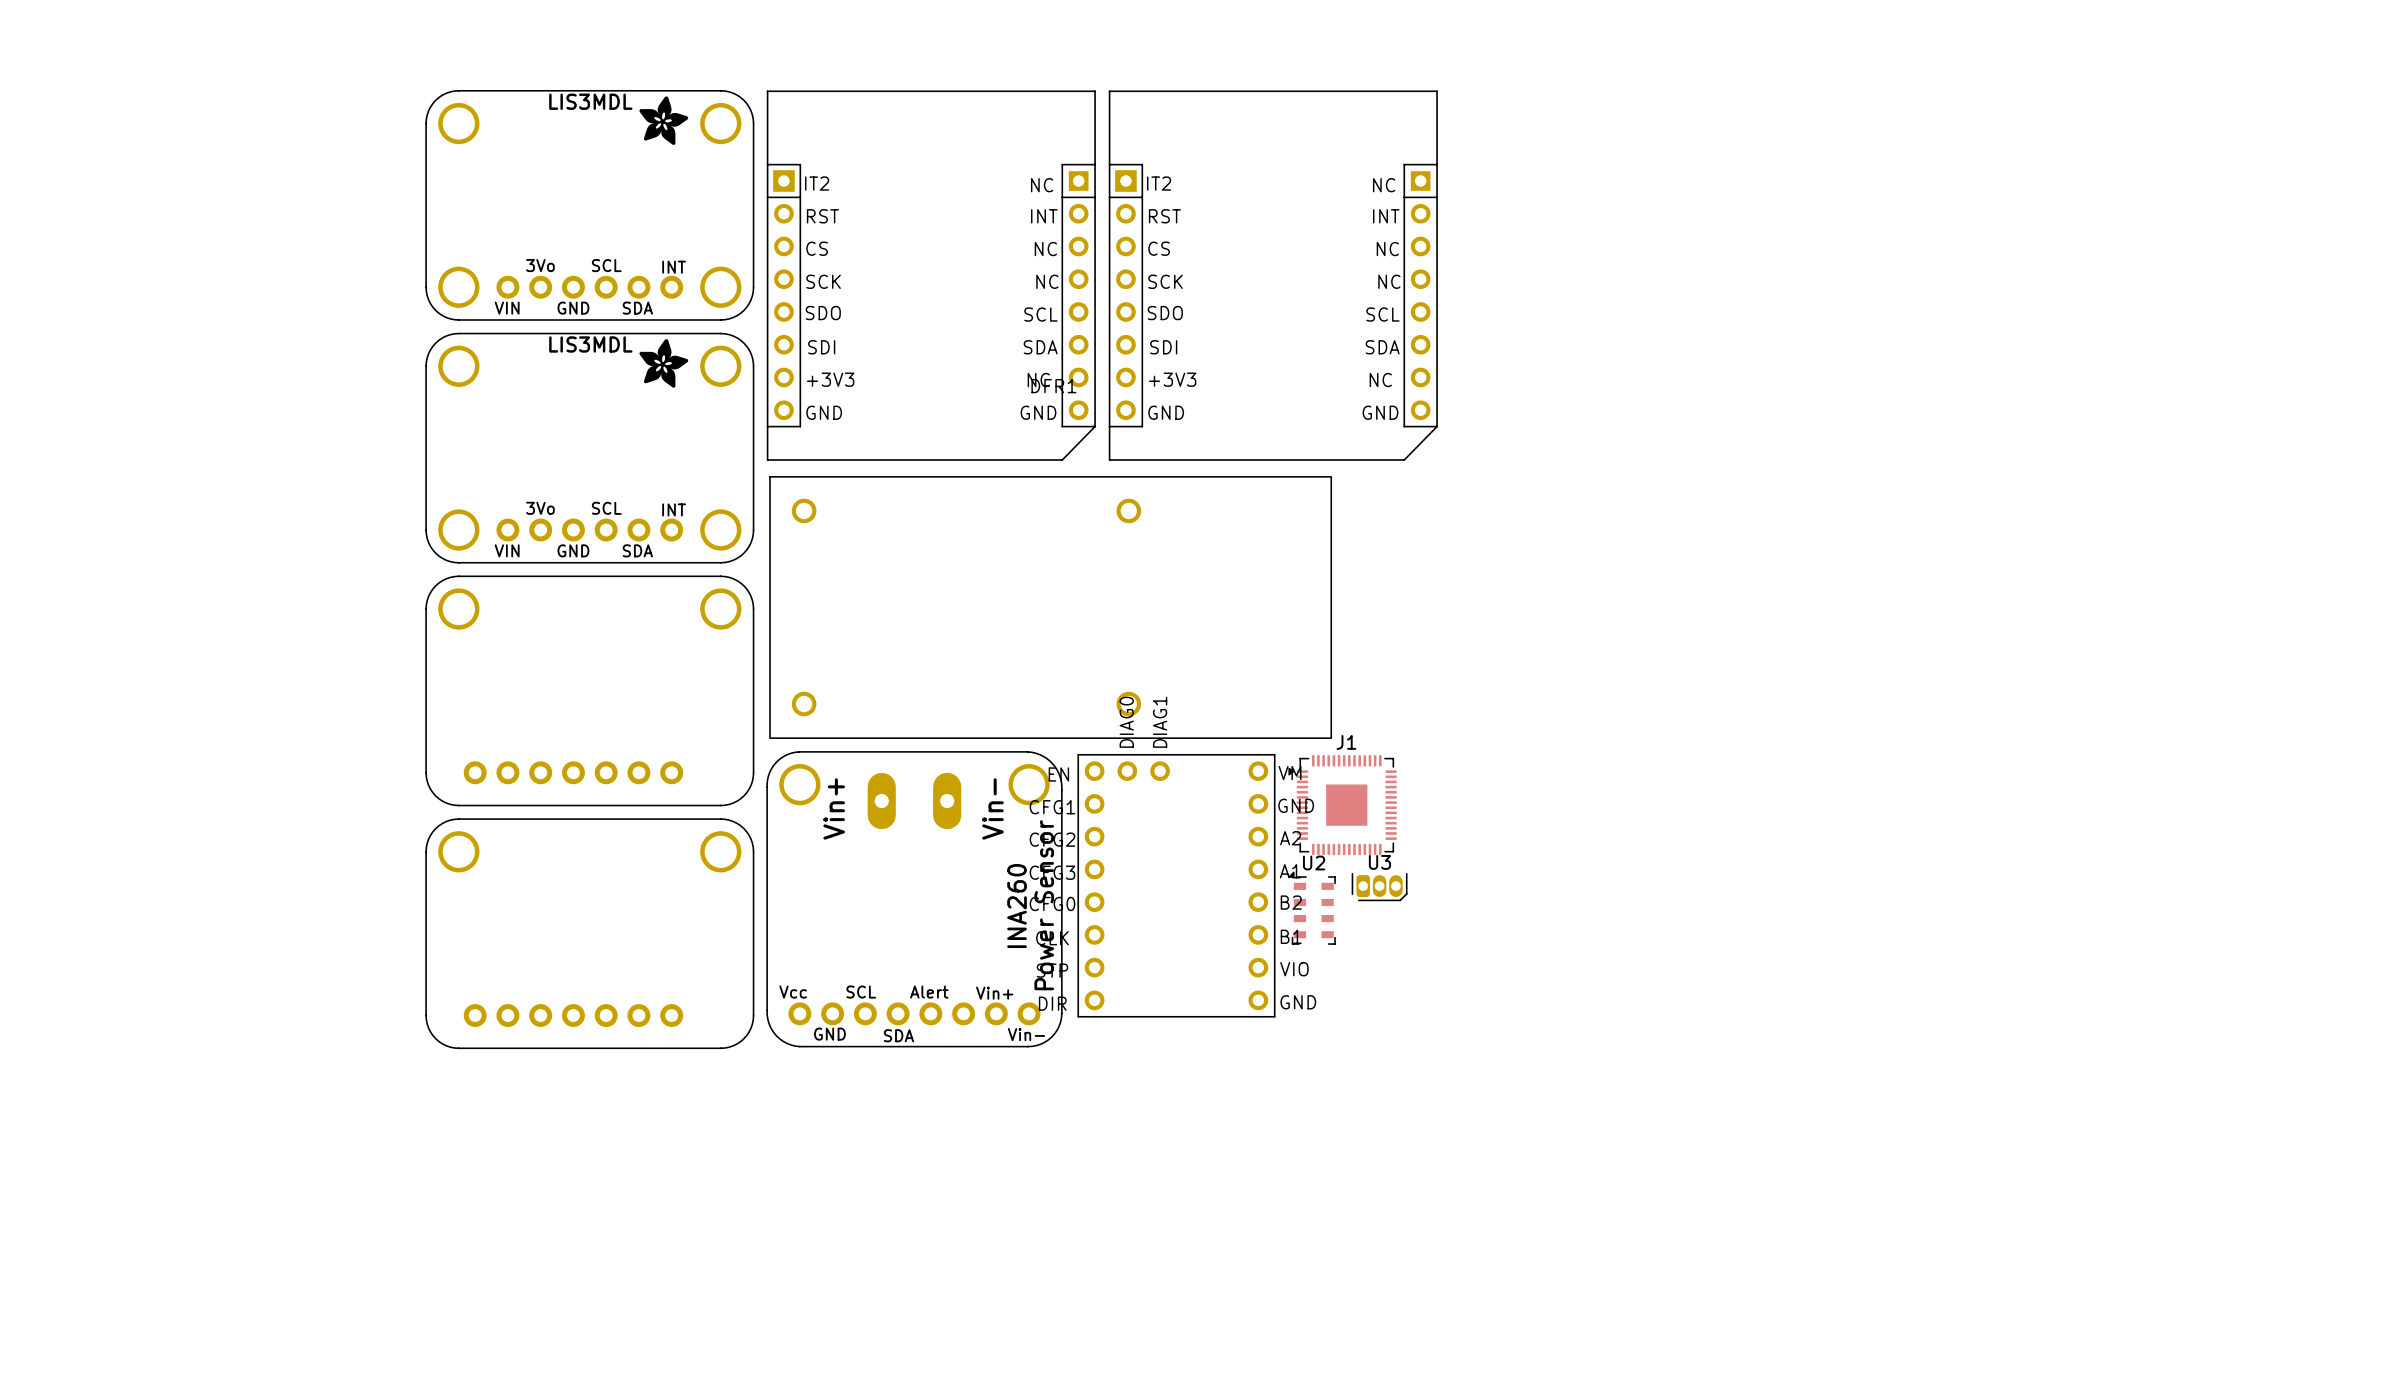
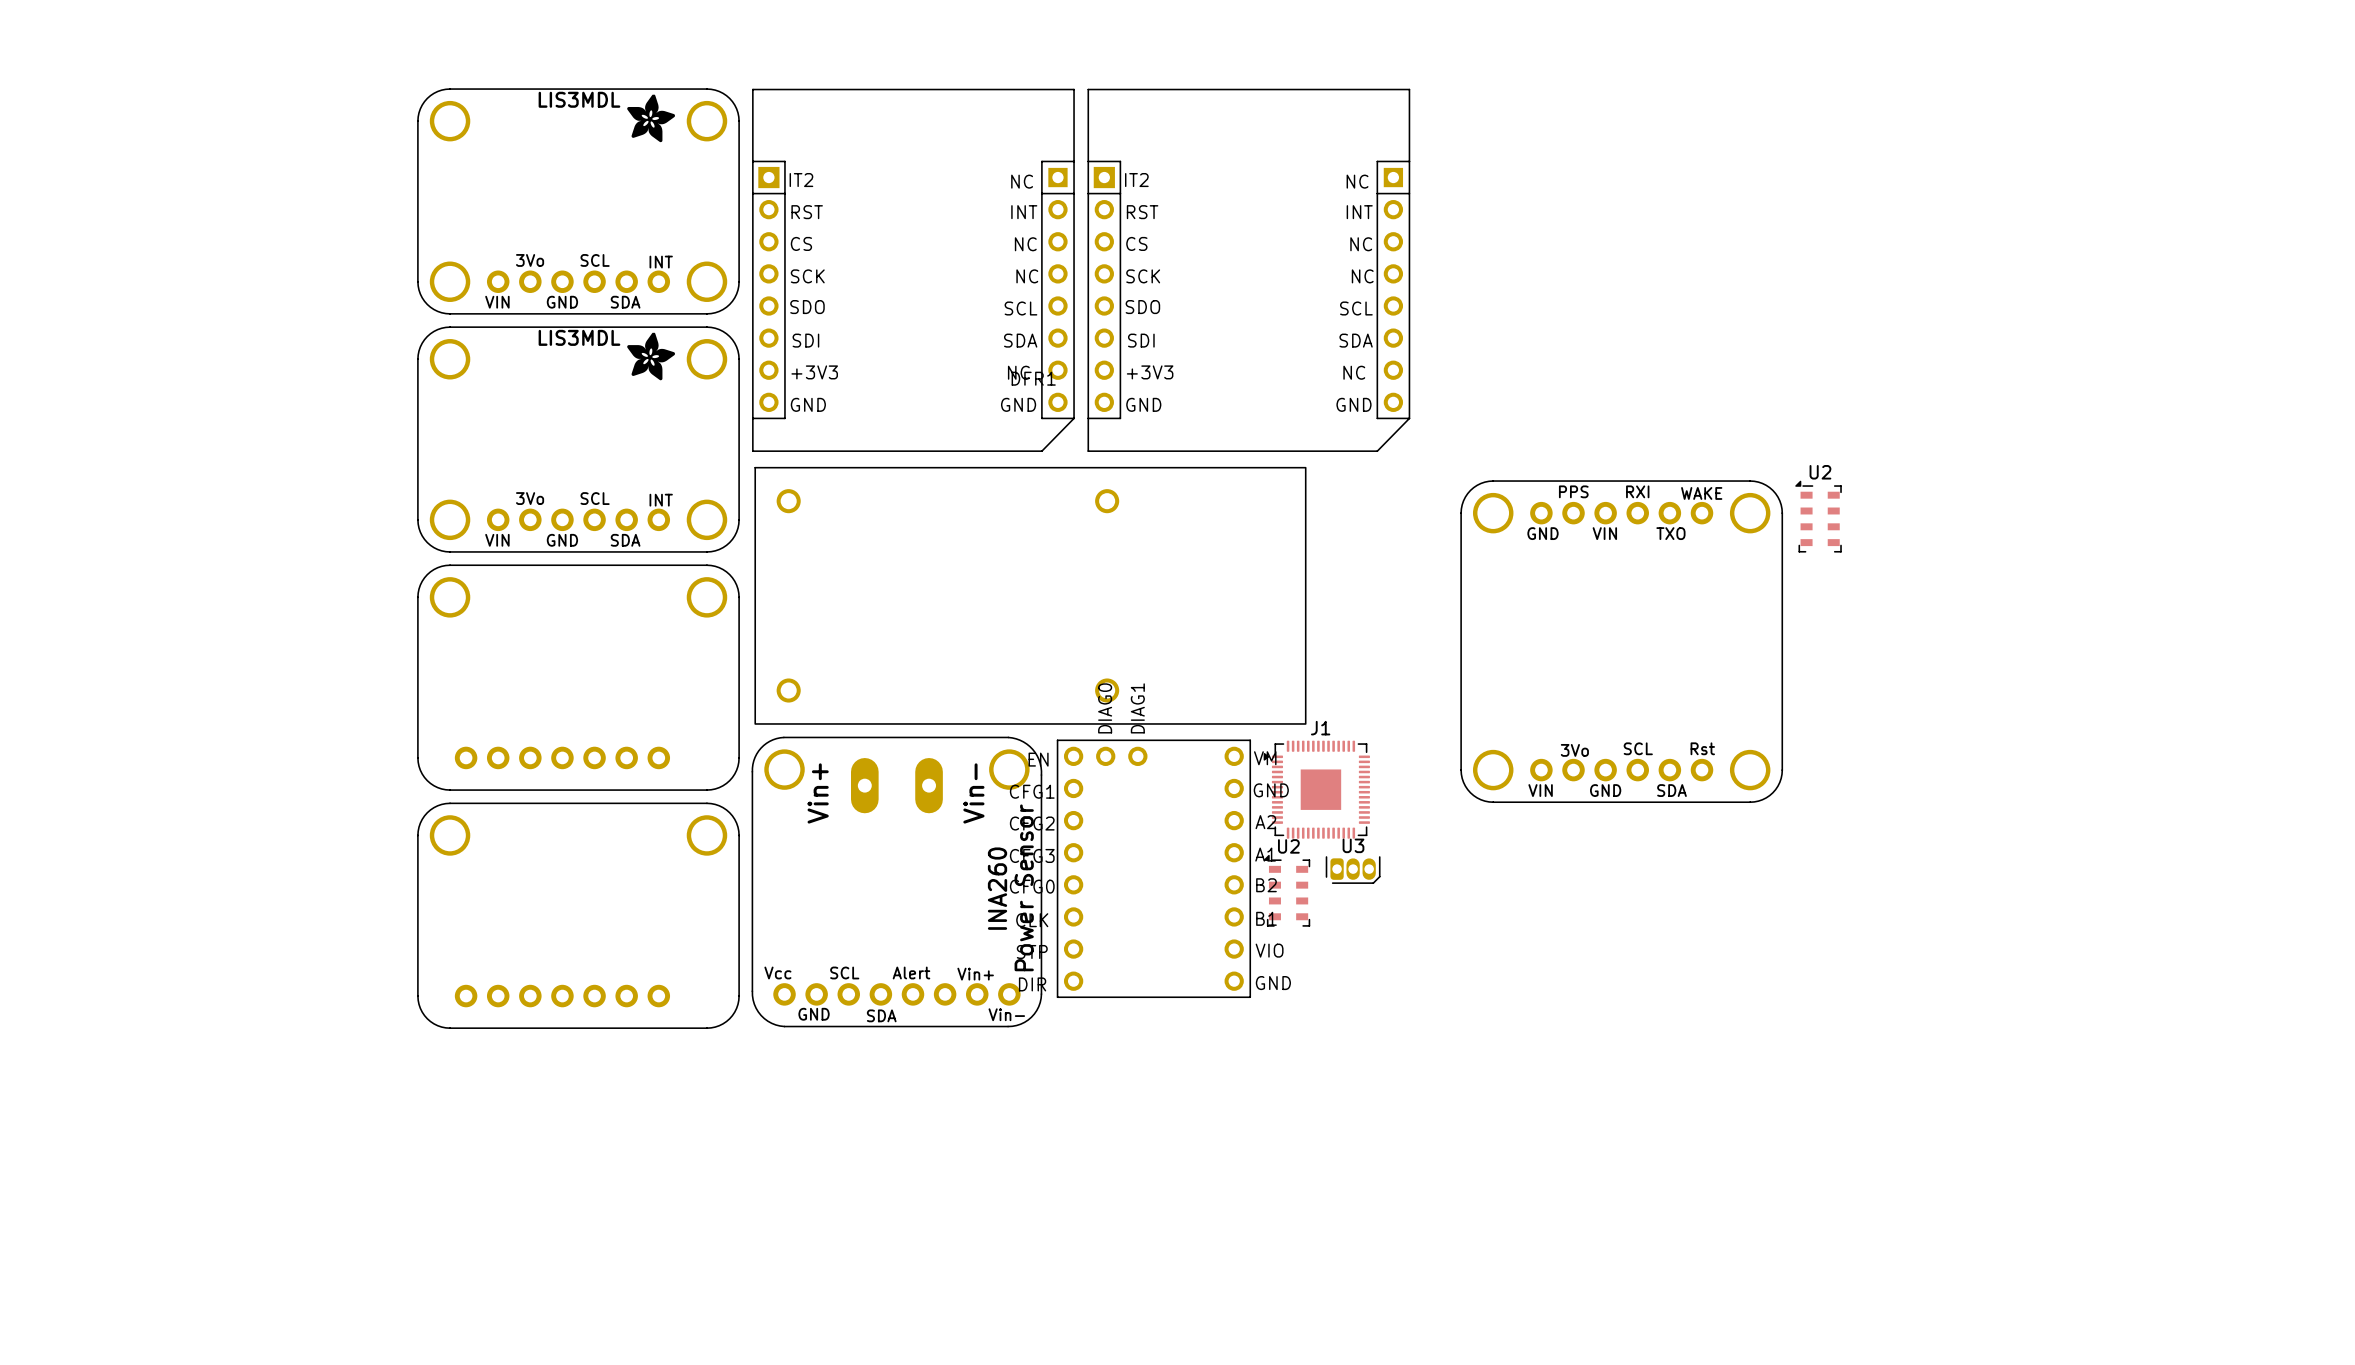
U2: none -> (1818, 516)
part: none -> (1621, 641)

